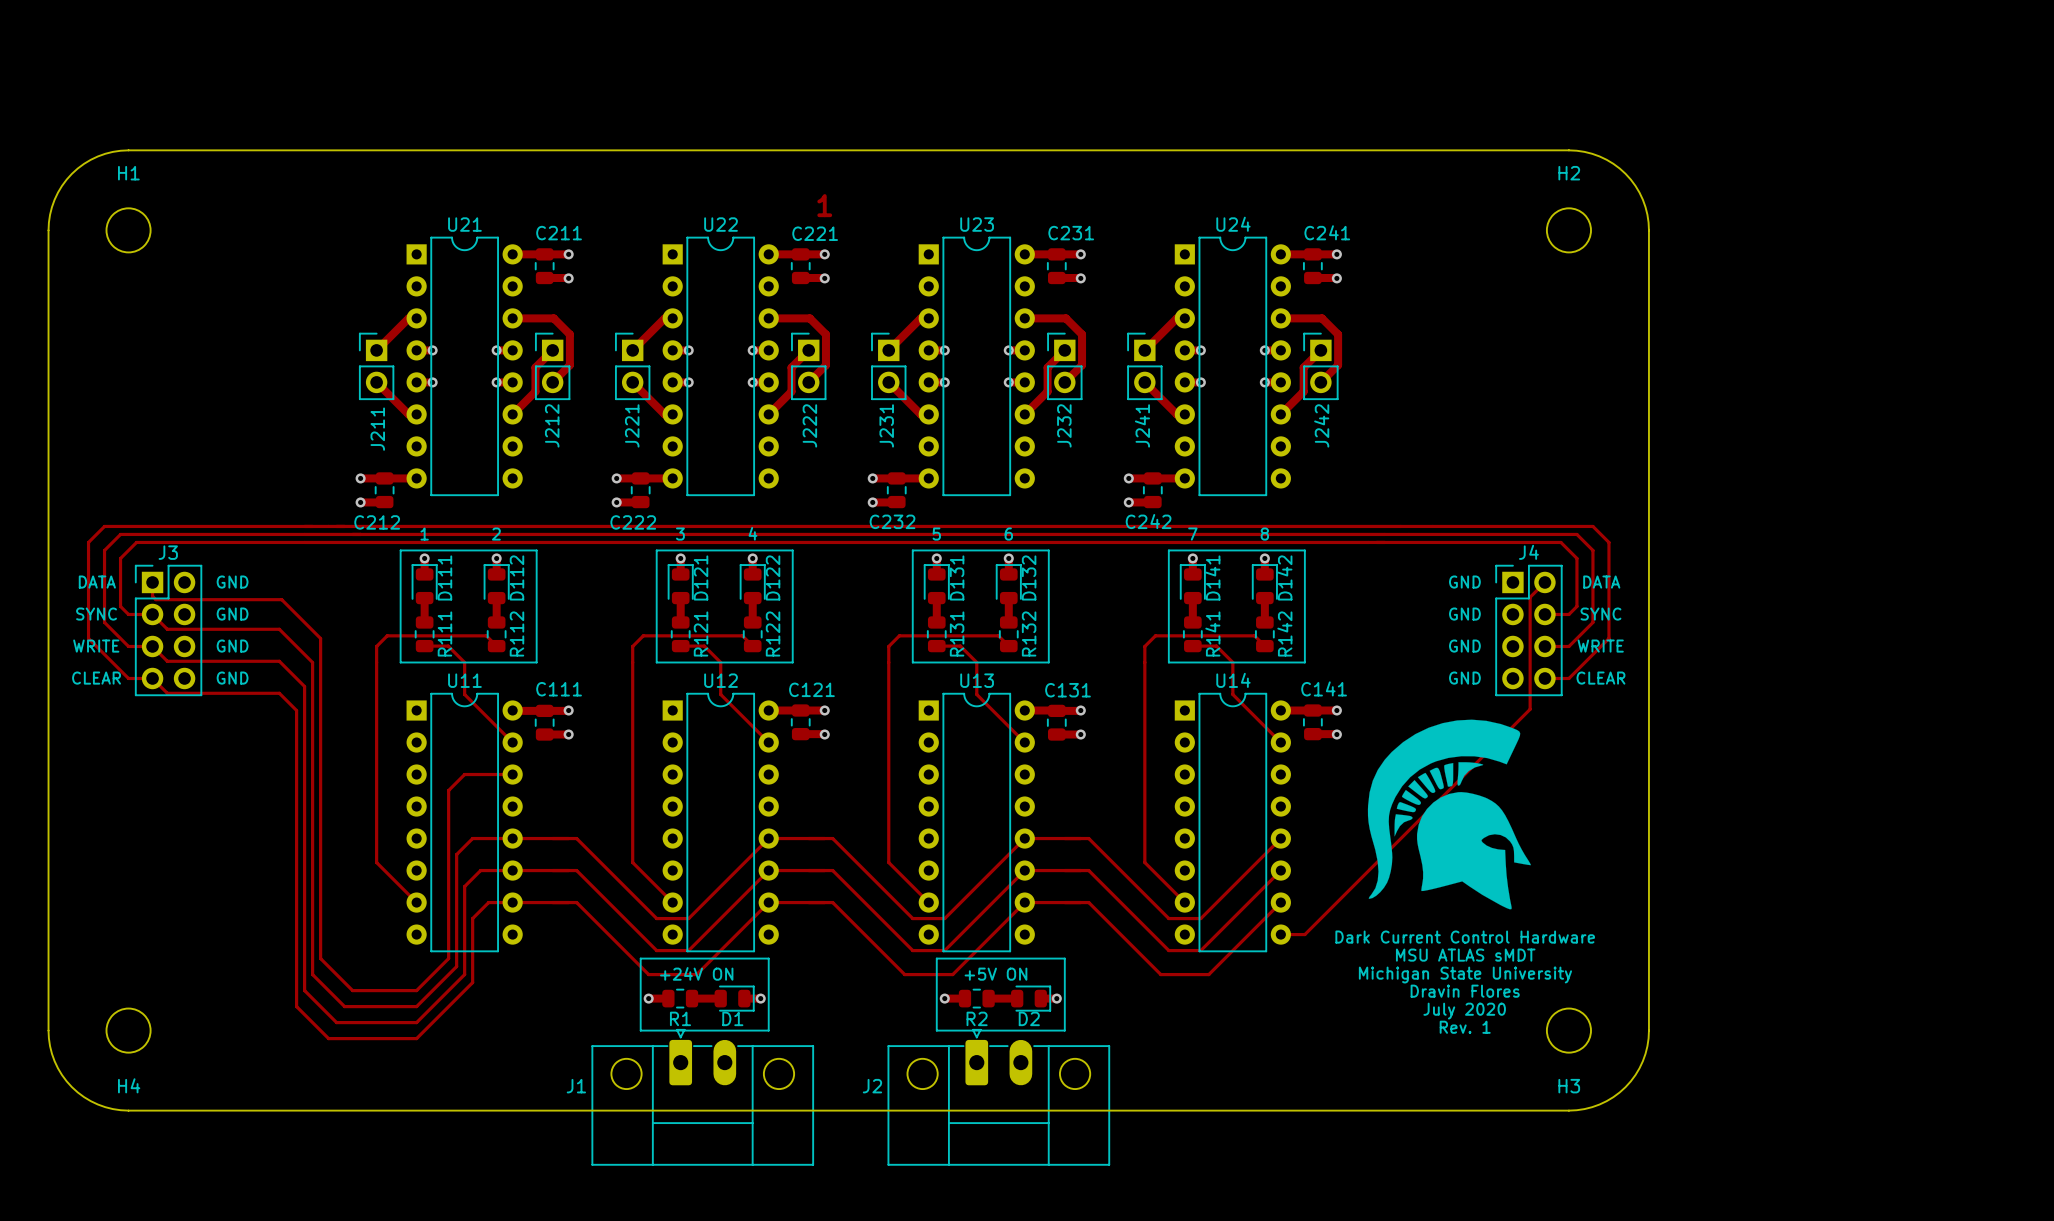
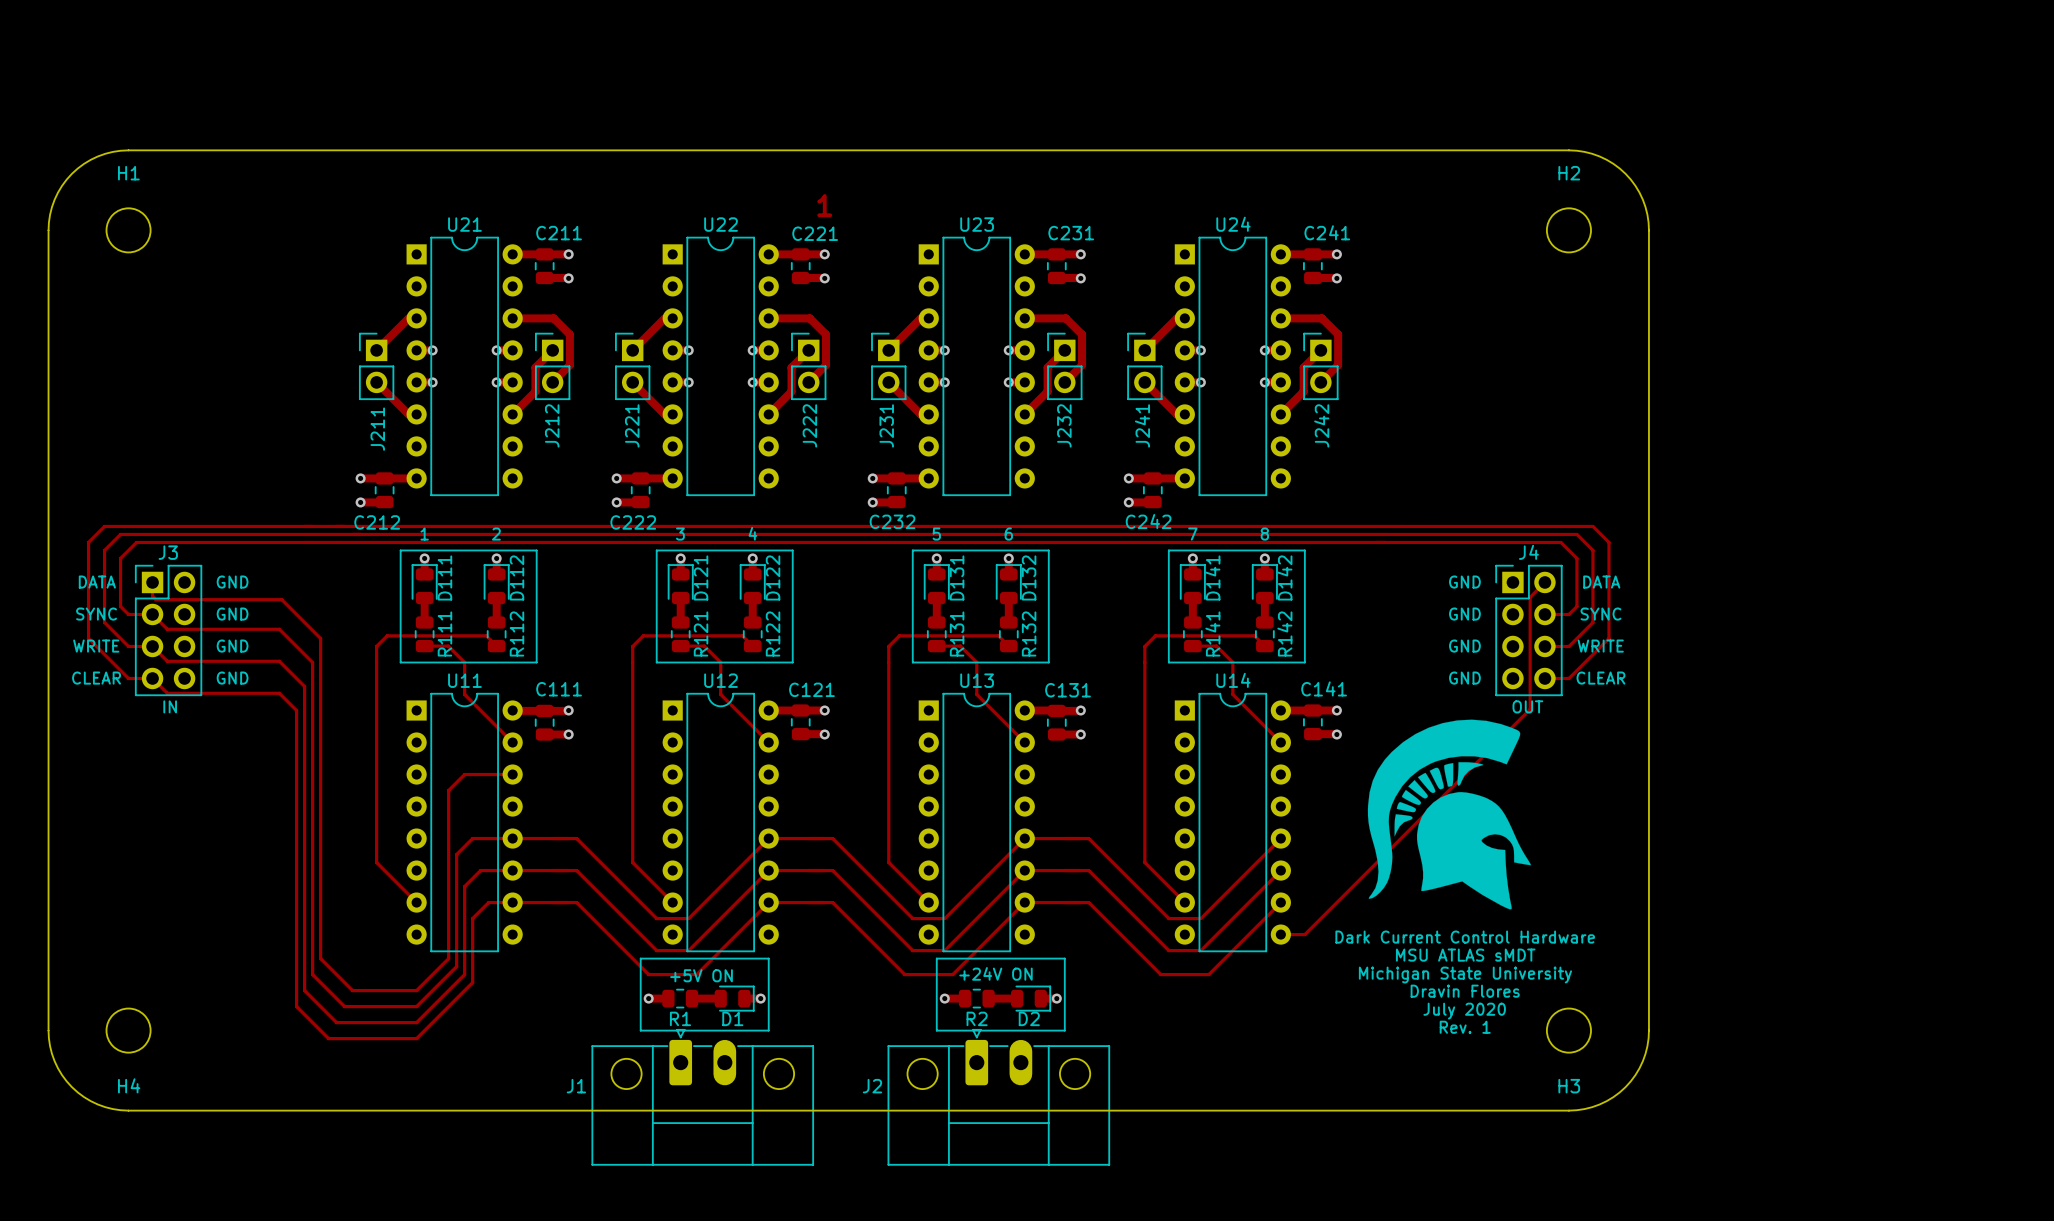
text: none -> IN (170, 706)
text: none -> OUT (1527, 706)
text: +24V ON (696, 973) -> +5V ON (701, 975)
text: +5V ON (995, 974) -> +24V ON (995, 973)

